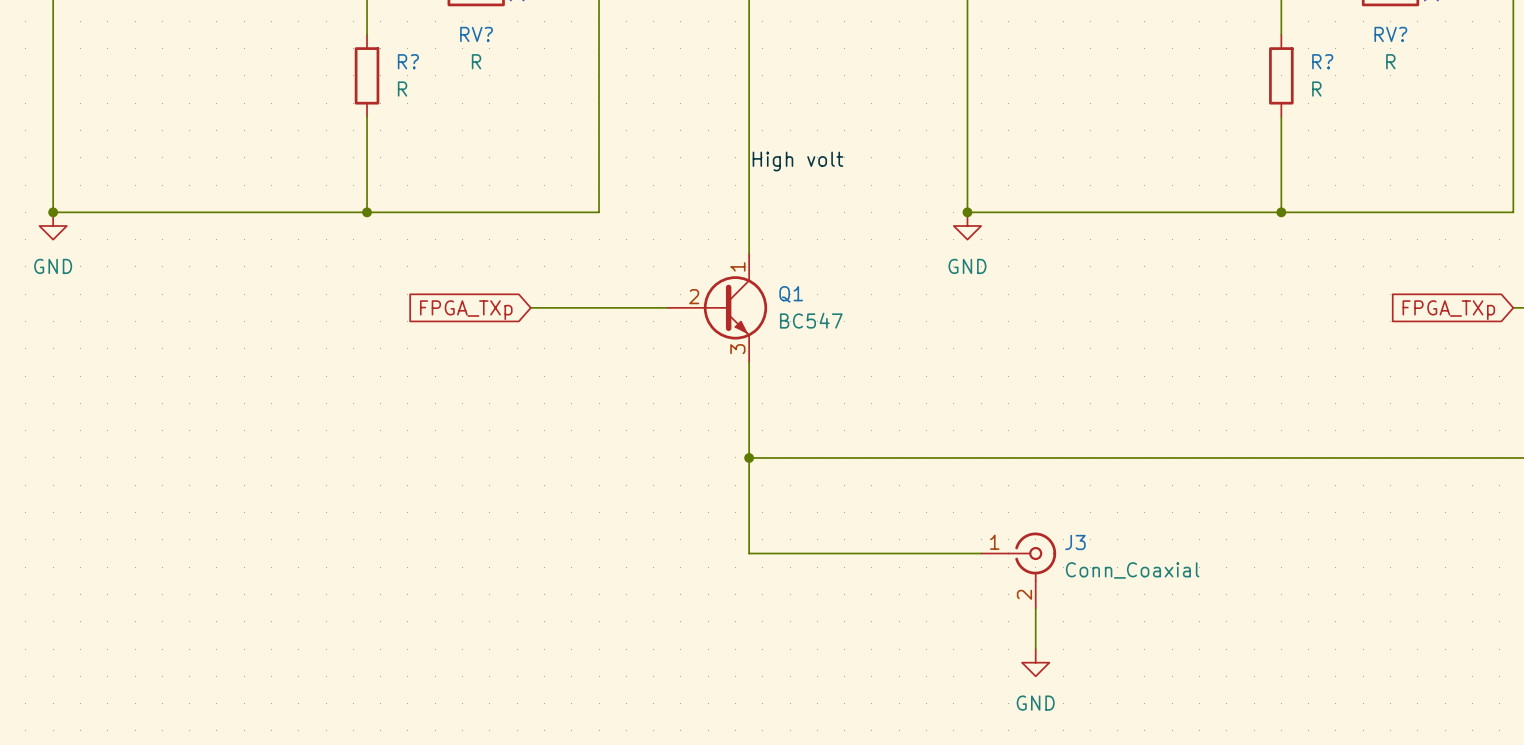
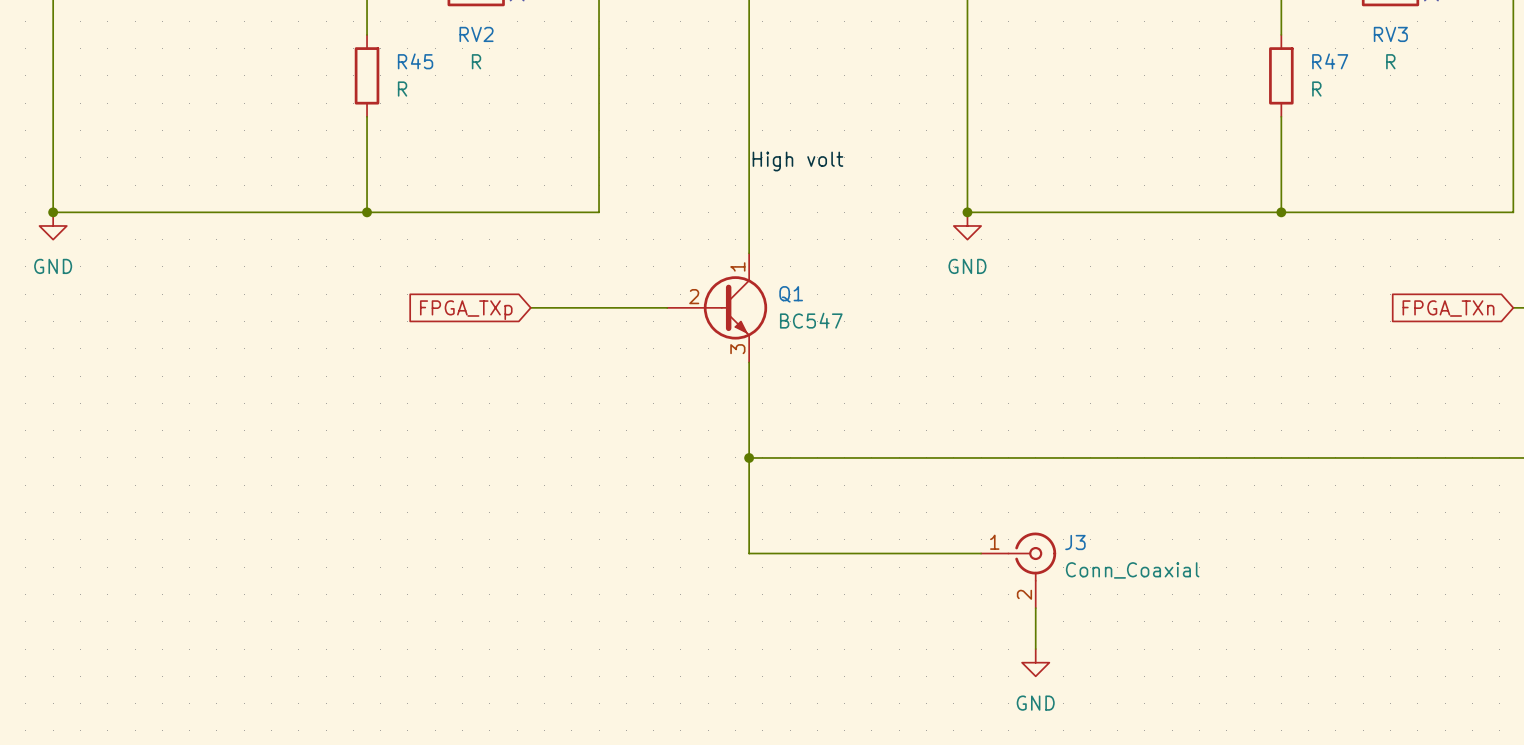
RV? name: RV? (476, 34) -> RV2 (476, 34)
RV? name: RV? (1390, 34) -> RV3 (1390, 34)
R? name: R? (408, 61) -> R45 (415, 61)
R? name: R? (1322, 61) -> R47 (1330, 61)
global label: FPGA_TXp (1448, 310) -> FPGA_TXn (1448, 308)

